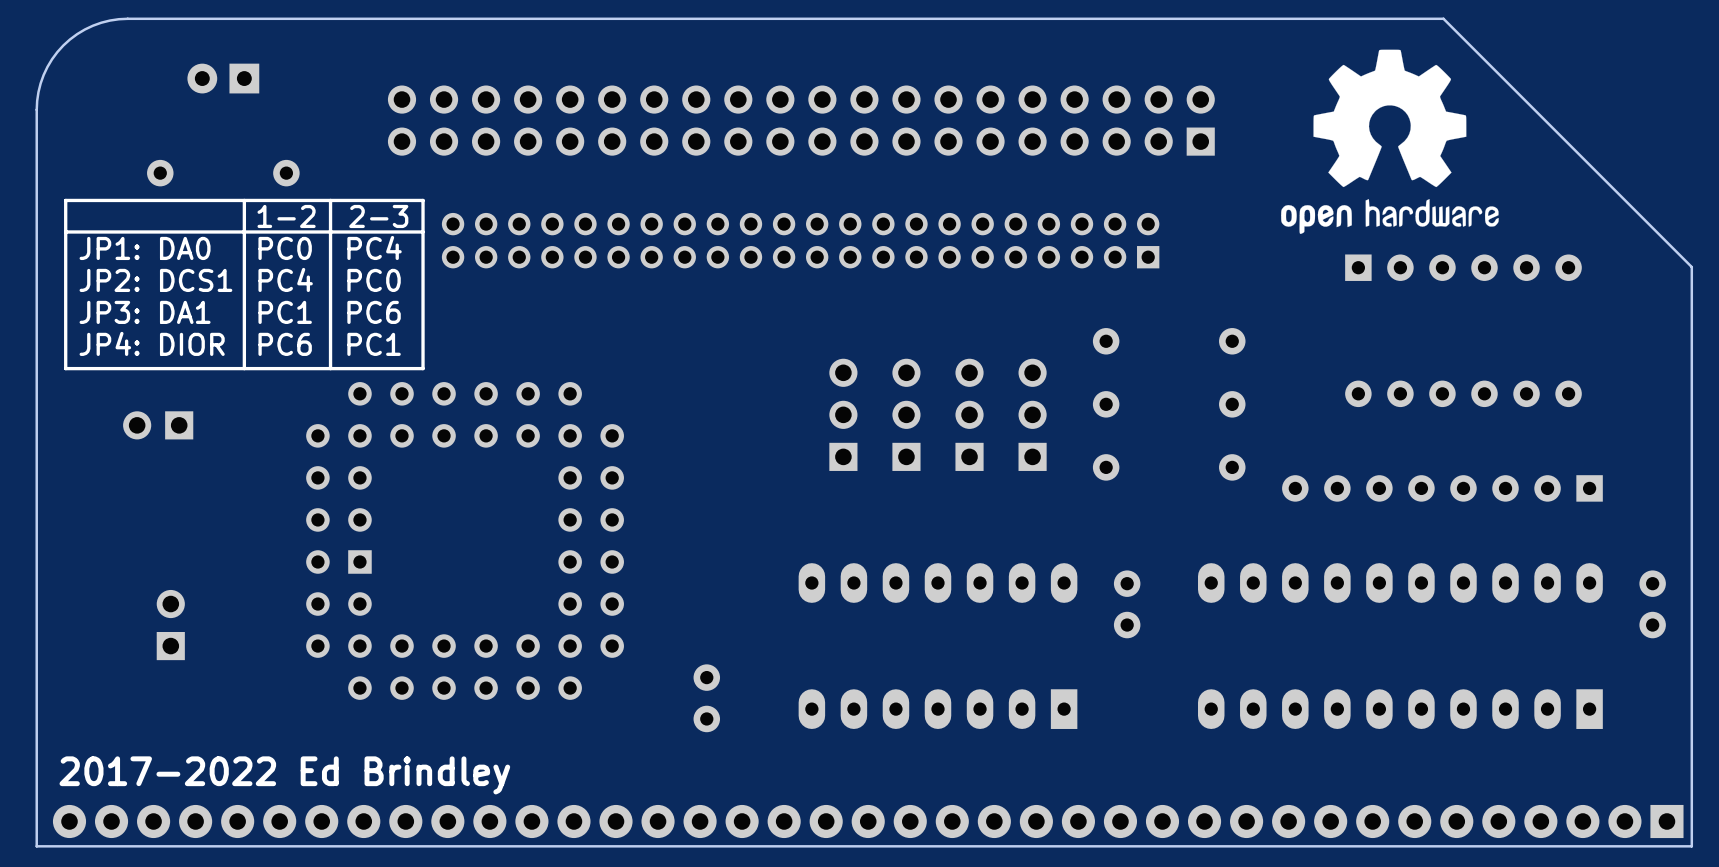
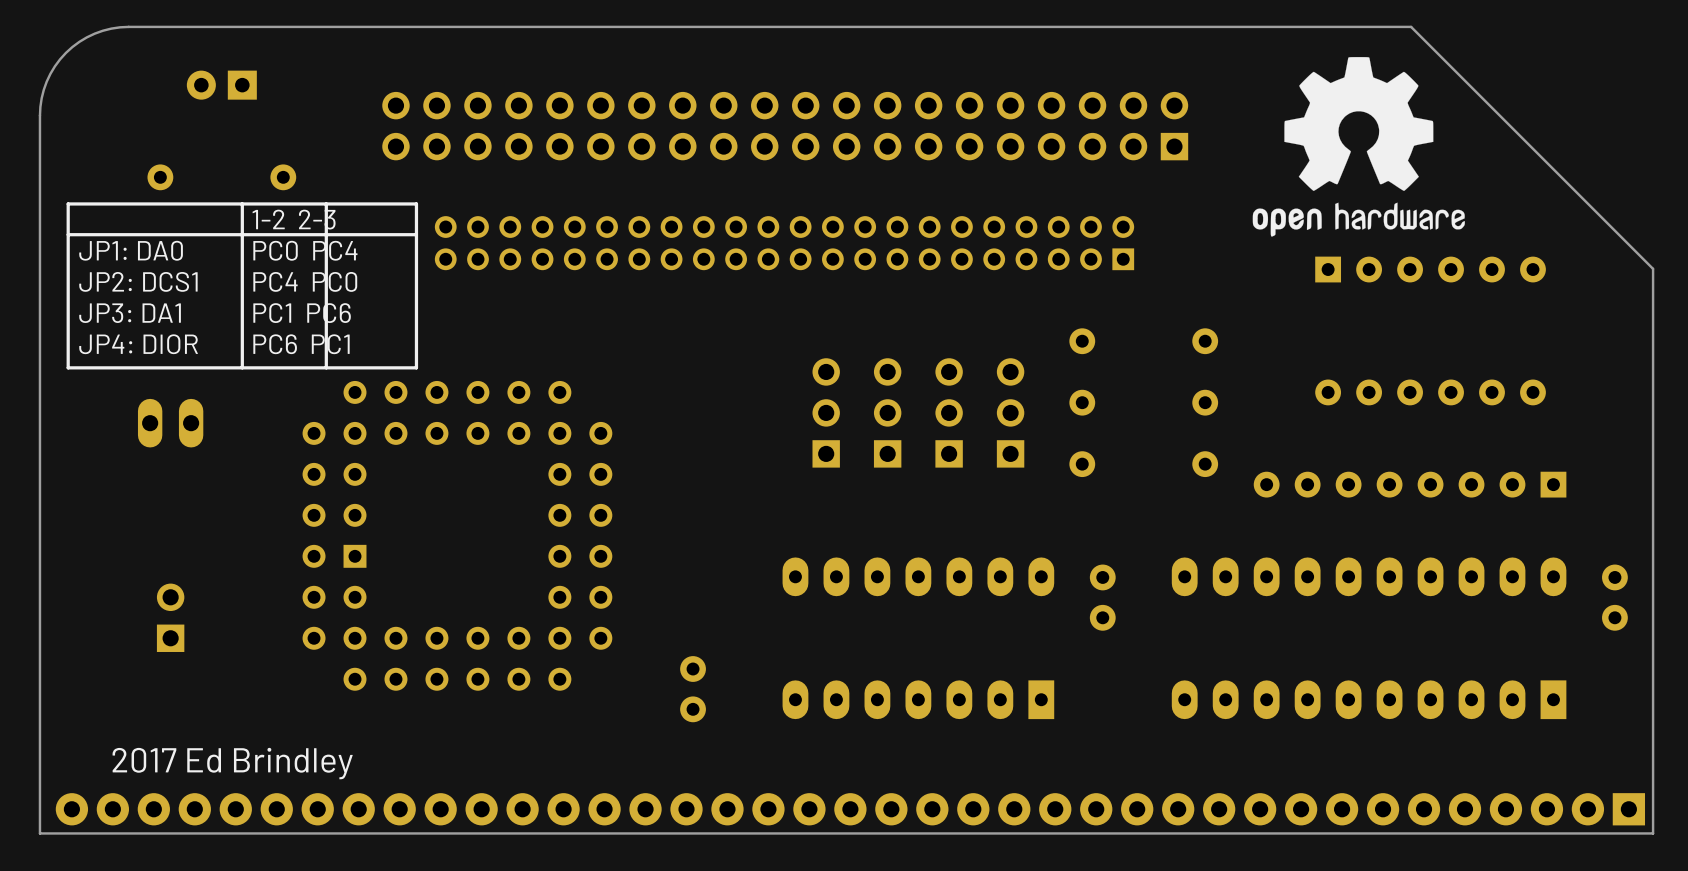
part footprint: [123, 411, 194, 440] -> [137, 398, 204, 448]
text: 2017-2022 Ed Brindley (284, 775) -> 2017 Ed Brindley (232, 763)

